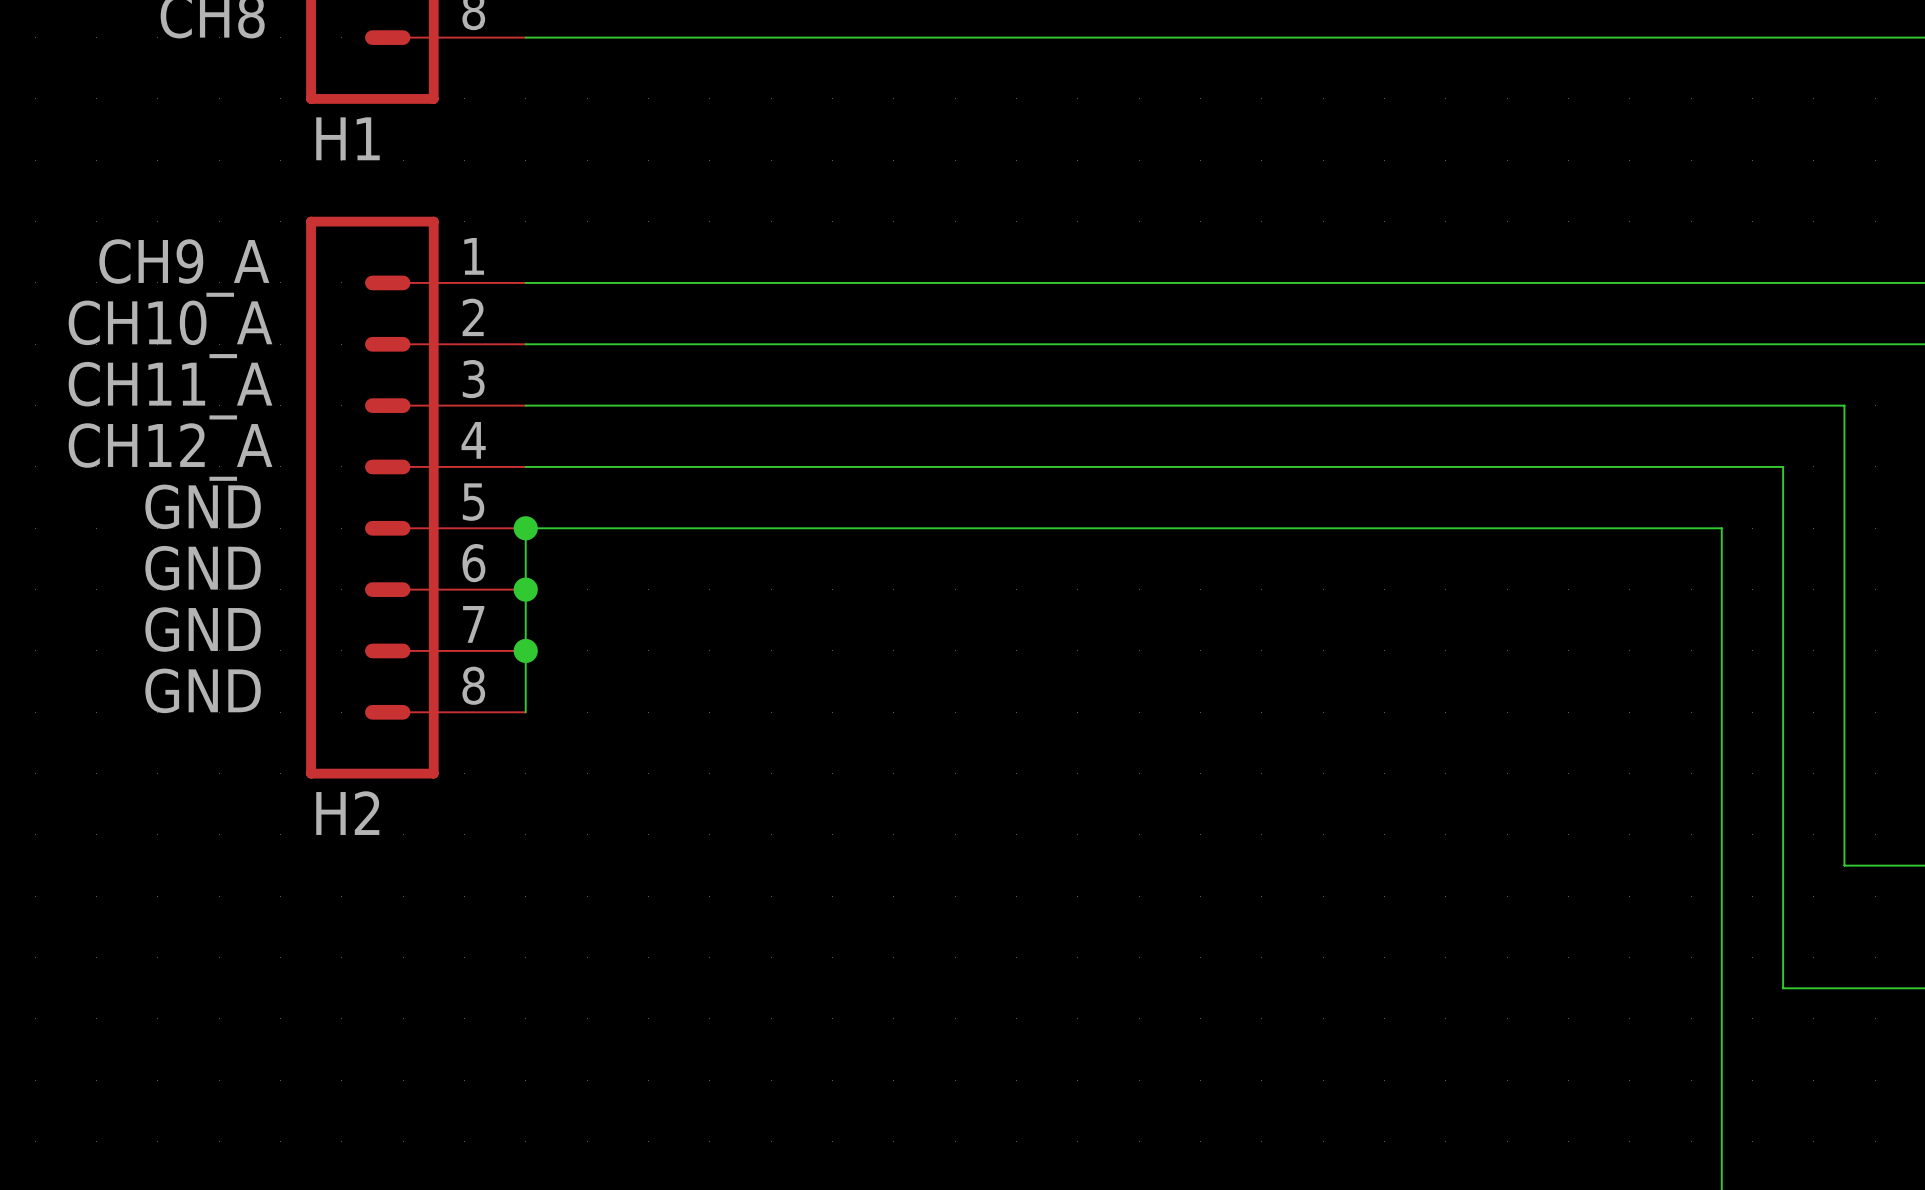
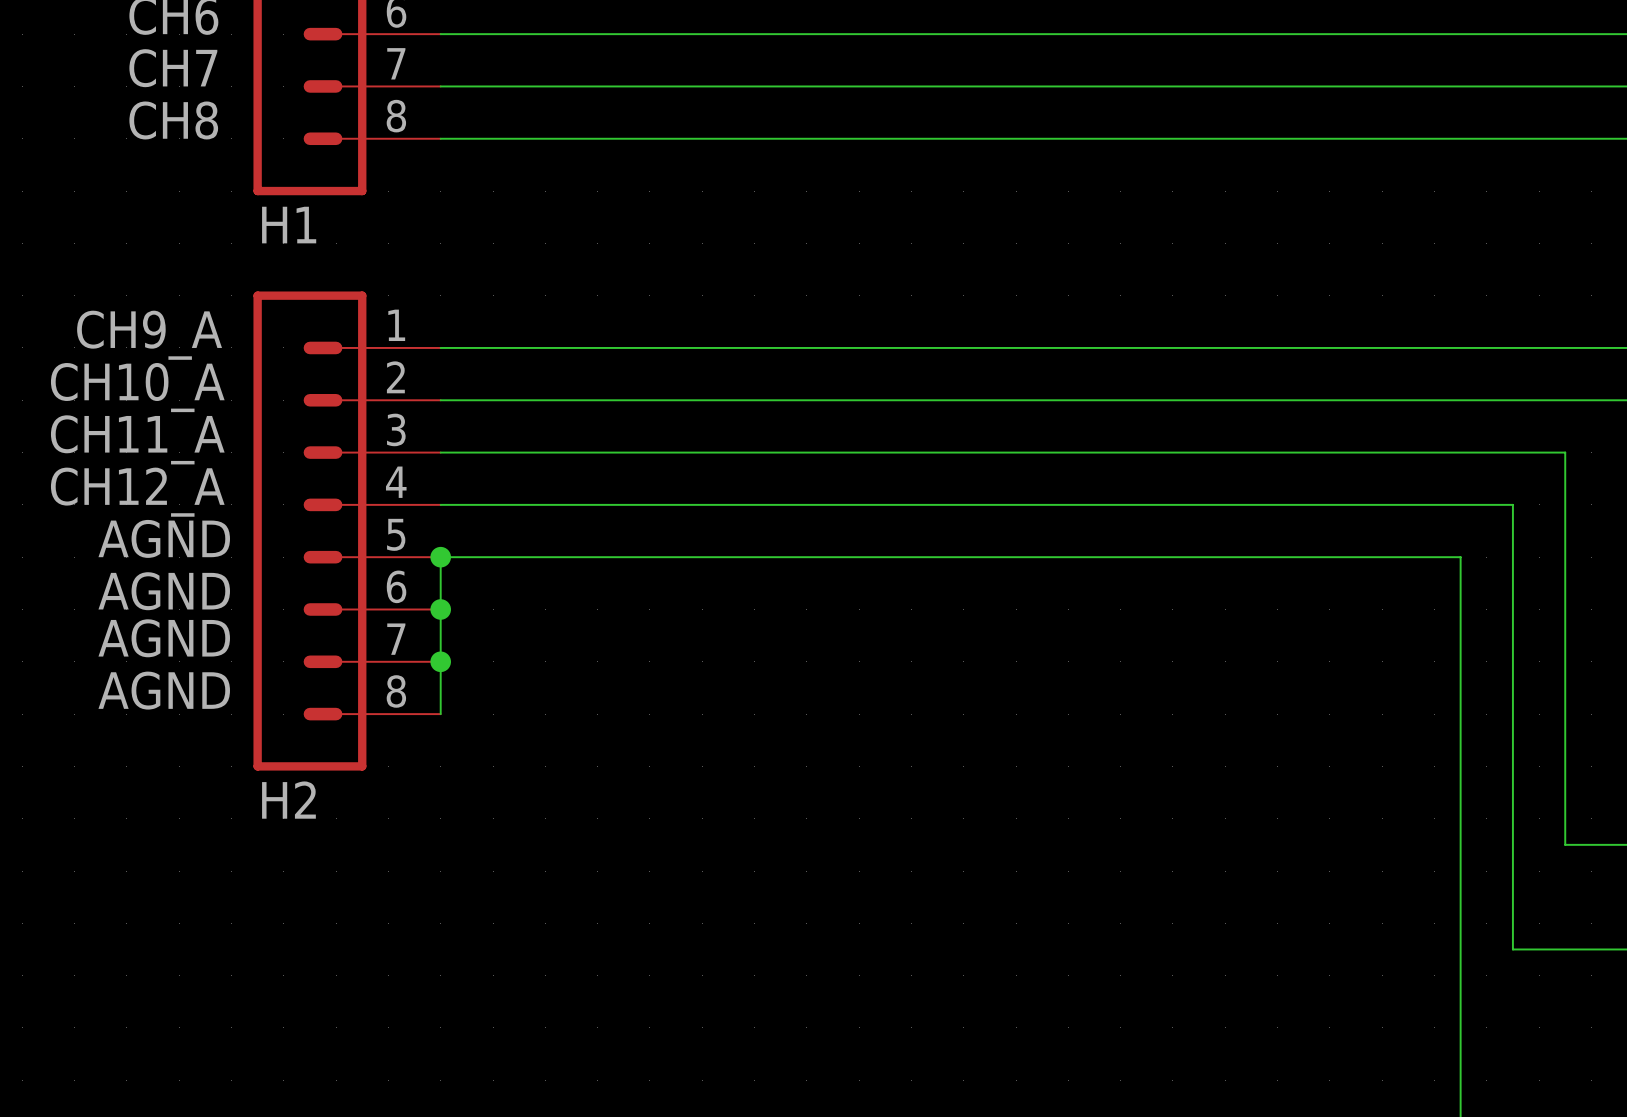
label: GND (203, 506) -> AGND (164, 538)
label: GND (203, 568) -> AGND (164, 591)
label: GND (203, 629) -> AGND (164, 638)
label: GND (203, 690) -> AGND (164, 690)

